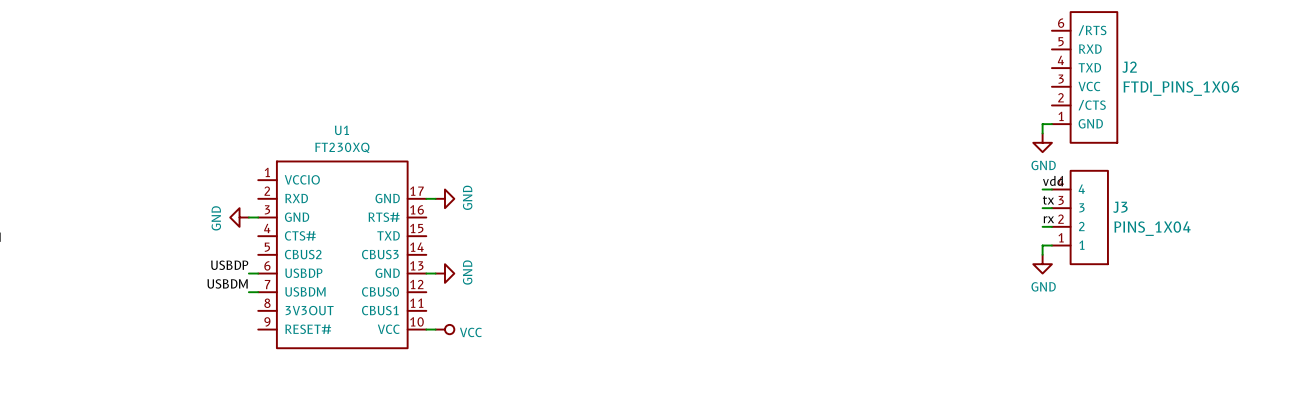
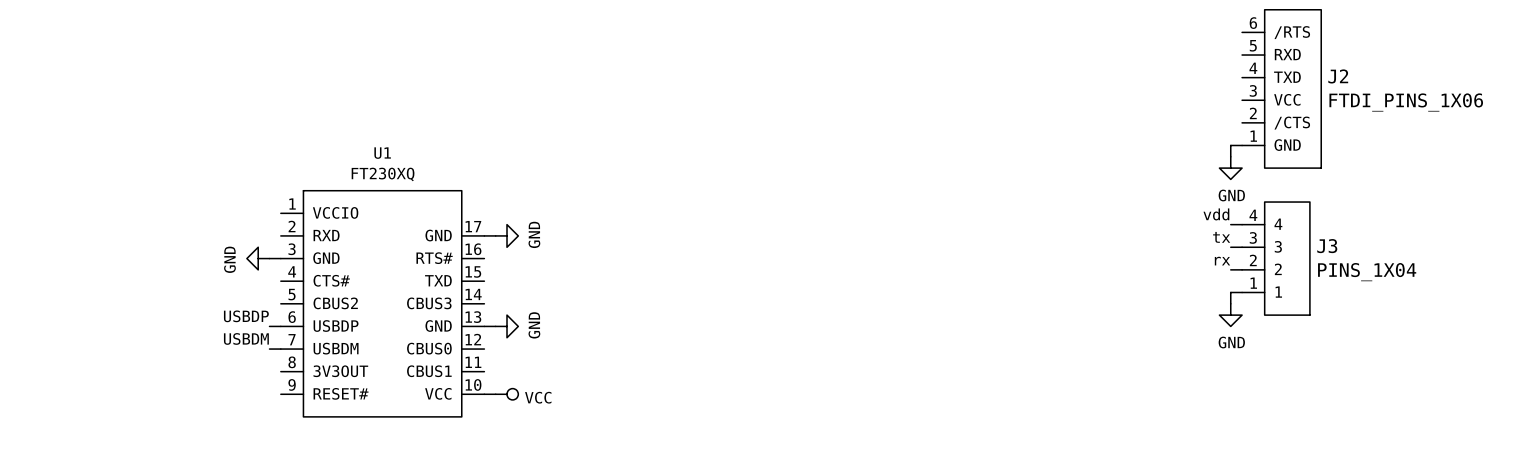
label position: vdd (1053, 180) -> vdd (1216, 214)
label position: tx (1048, 200) -> tx (1221, 237)
label position: rx (1048, 219) -> rx (1222, 261)

